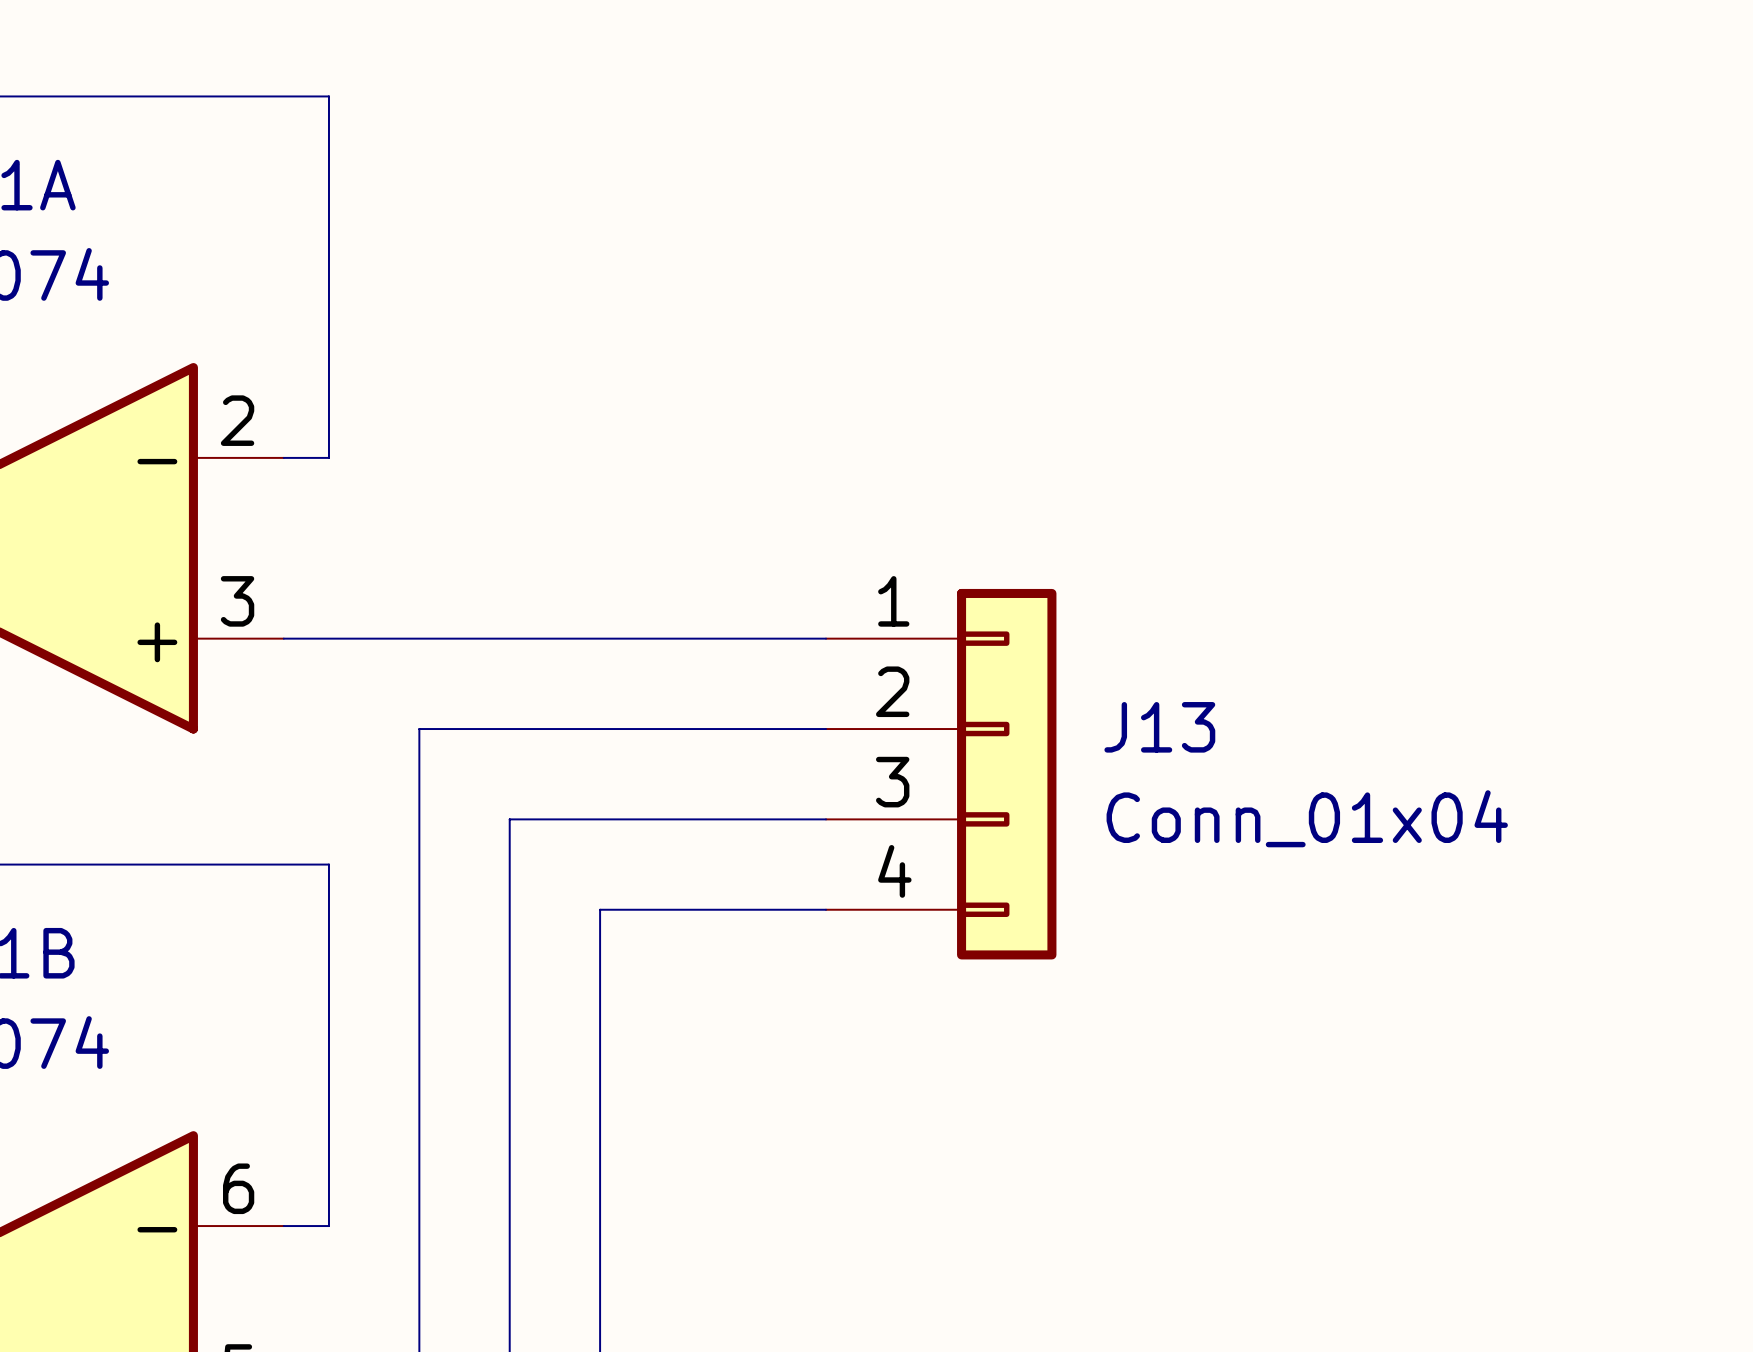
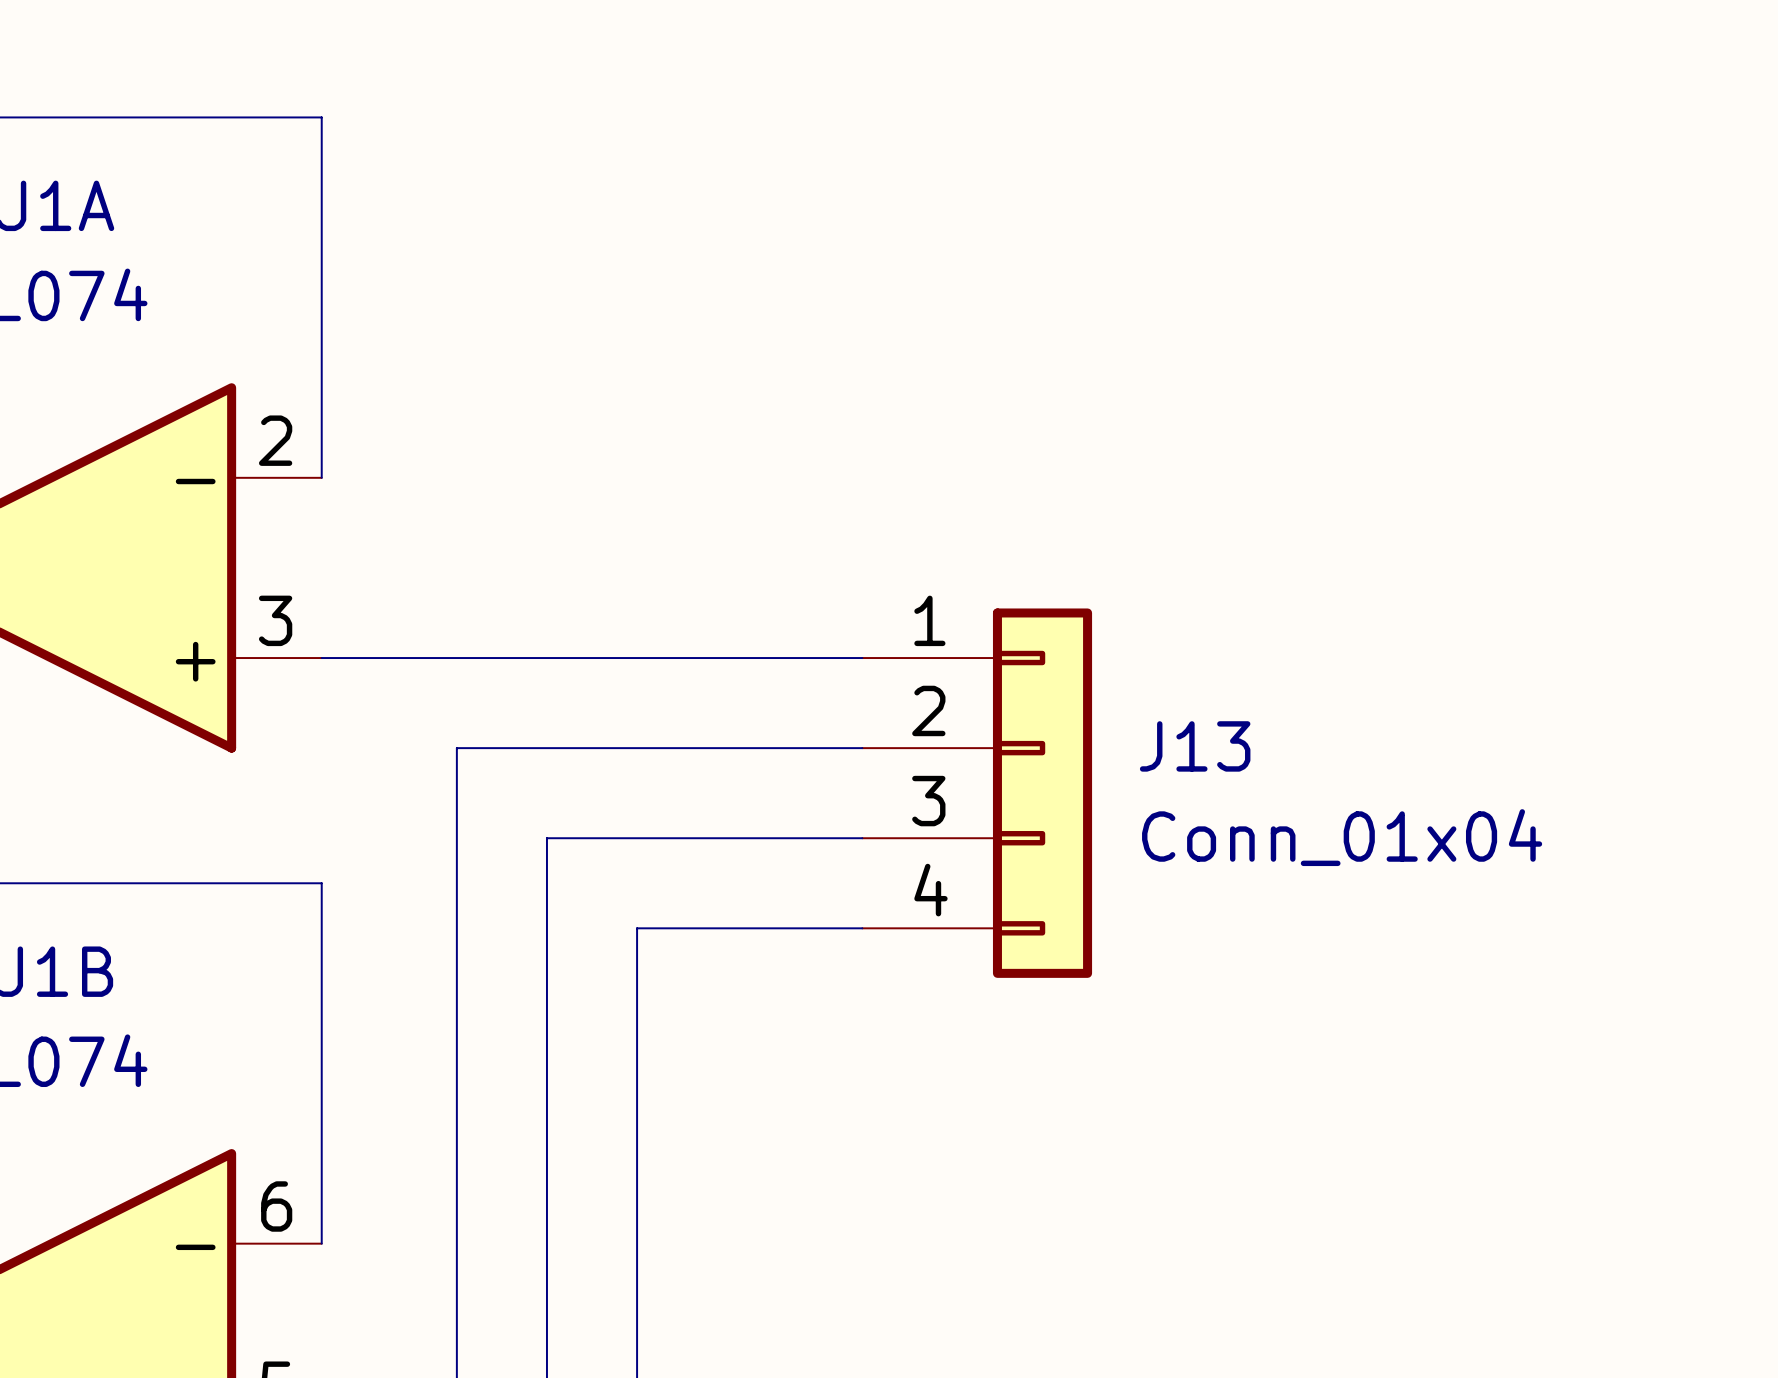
wire: (283, 96) (328, 96) (328, 457) (283, 457) -> (321, 117) (321, 477)
wire: (283, 864) (328, 864) (328, 1226) (283, 1226) -> (321, 883) (321, 1243)

